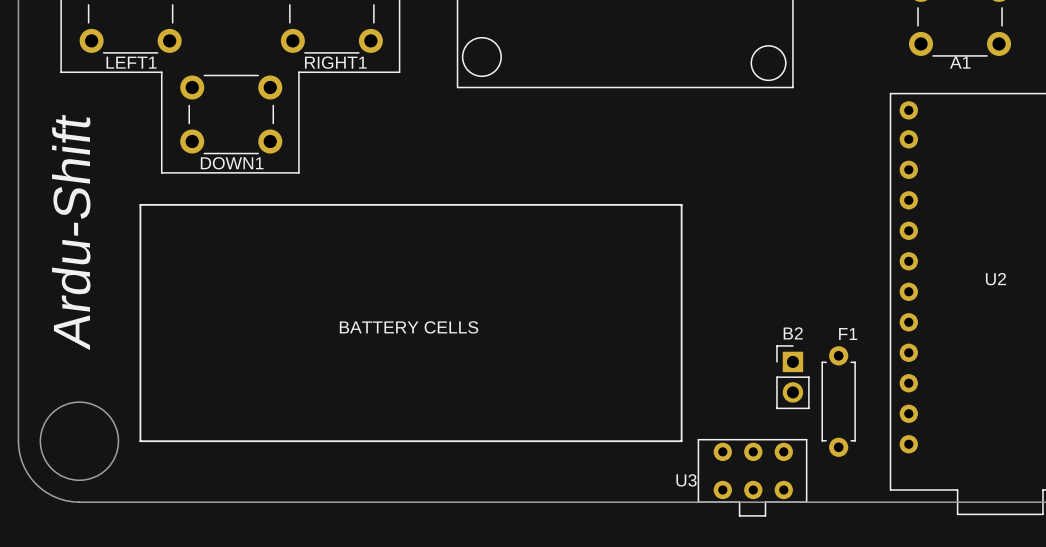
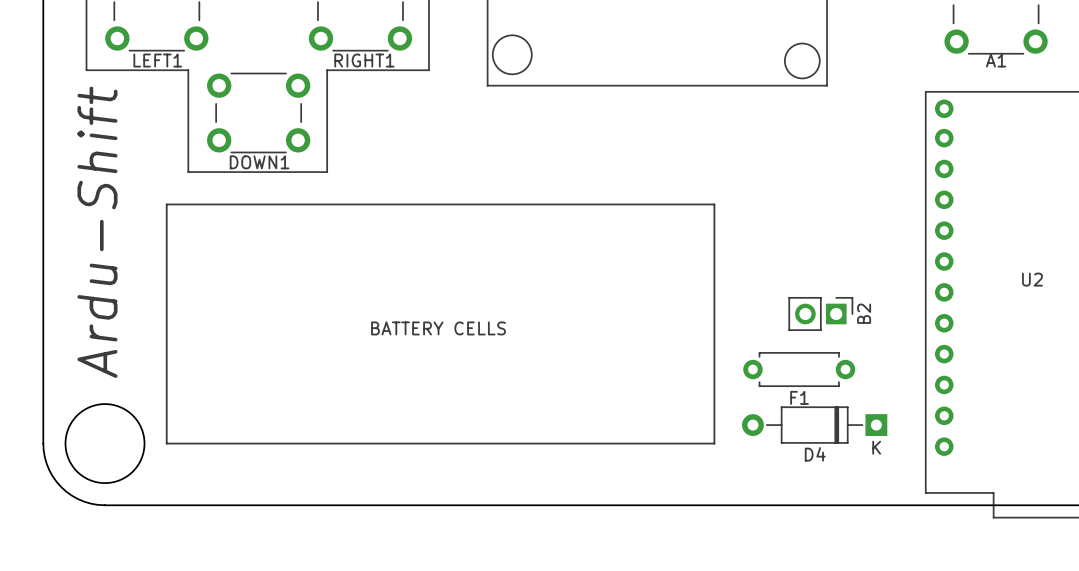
F1 name position: F1 (848, 334) -> F1 (799, 397)
B2 rotation: 0° (792, 377) -> 90° clockwise (820, 313)
B2 position: (792, 377) -> (820, 313)
F1 rotation: 0° (838, 401) -> 90° clockwise (799, 369)
F1 position: (838, 401) -> (799, 369)
D4: none -> (814, 425)
U3: (752, 477) -> none

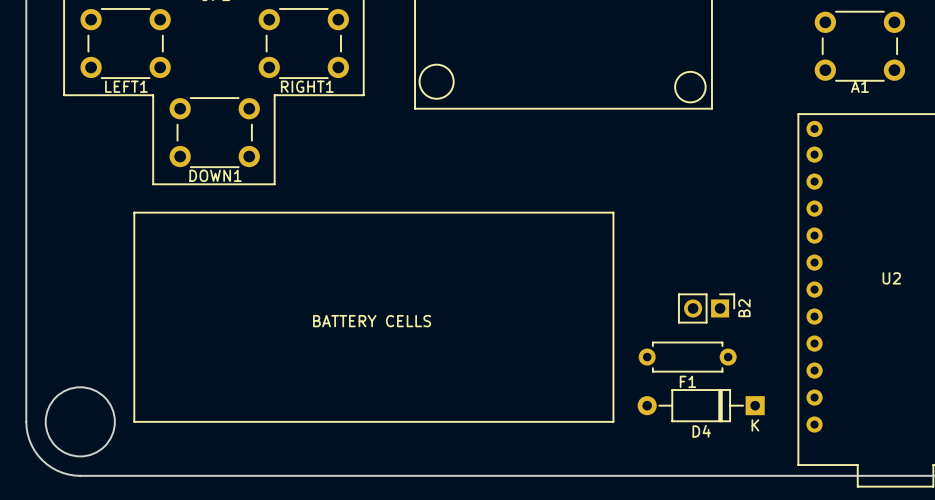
text: Ardu-Shift (97, 232) -> none

